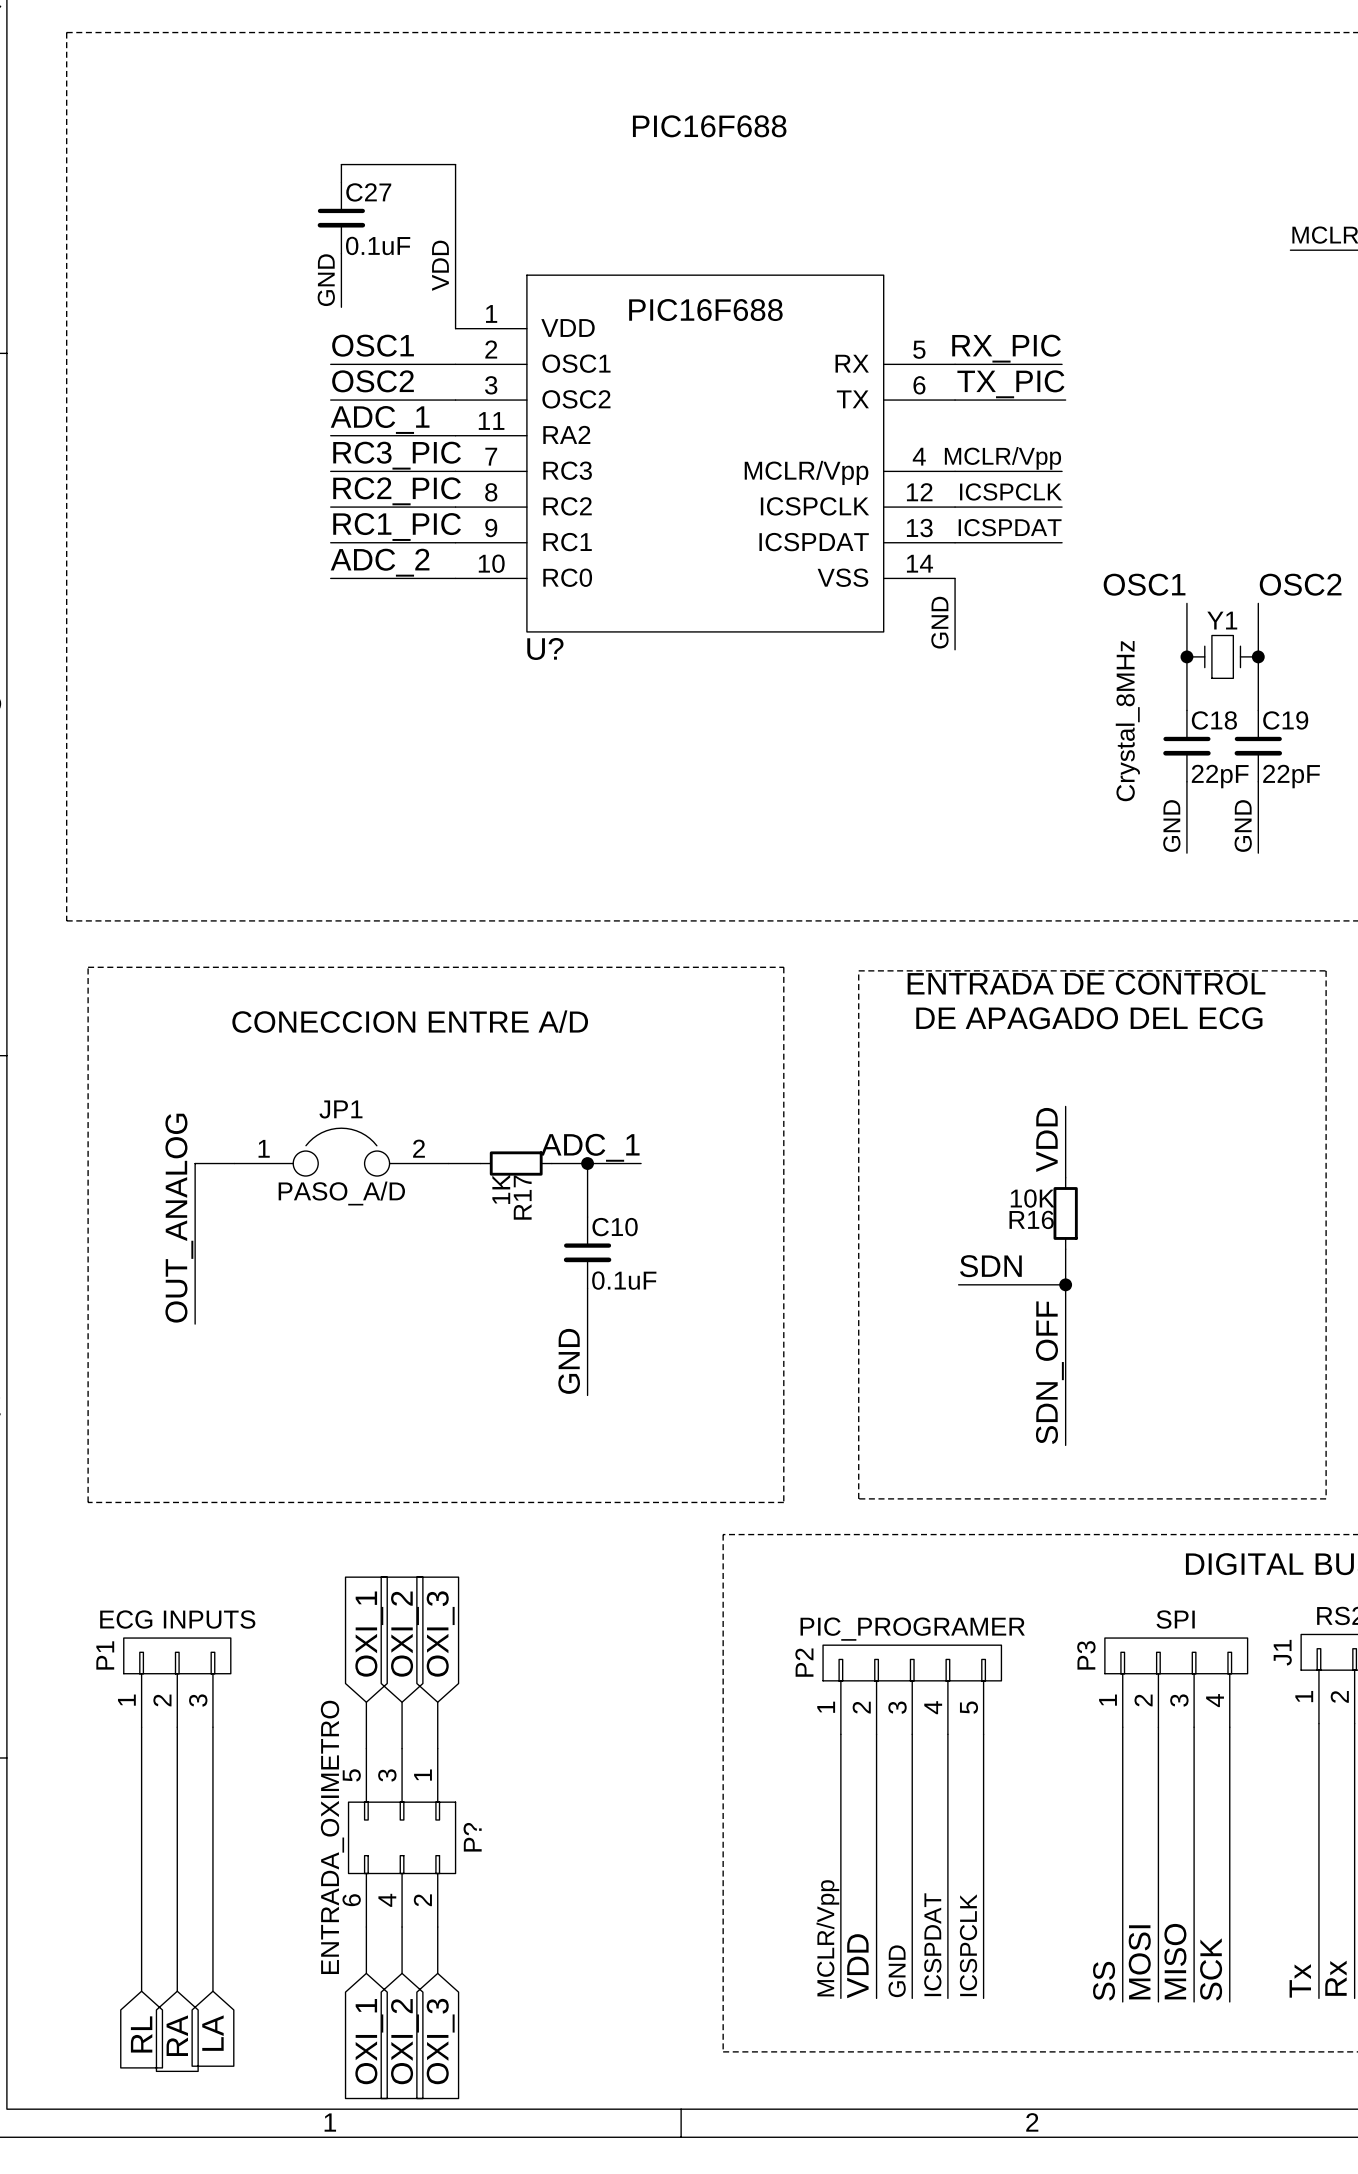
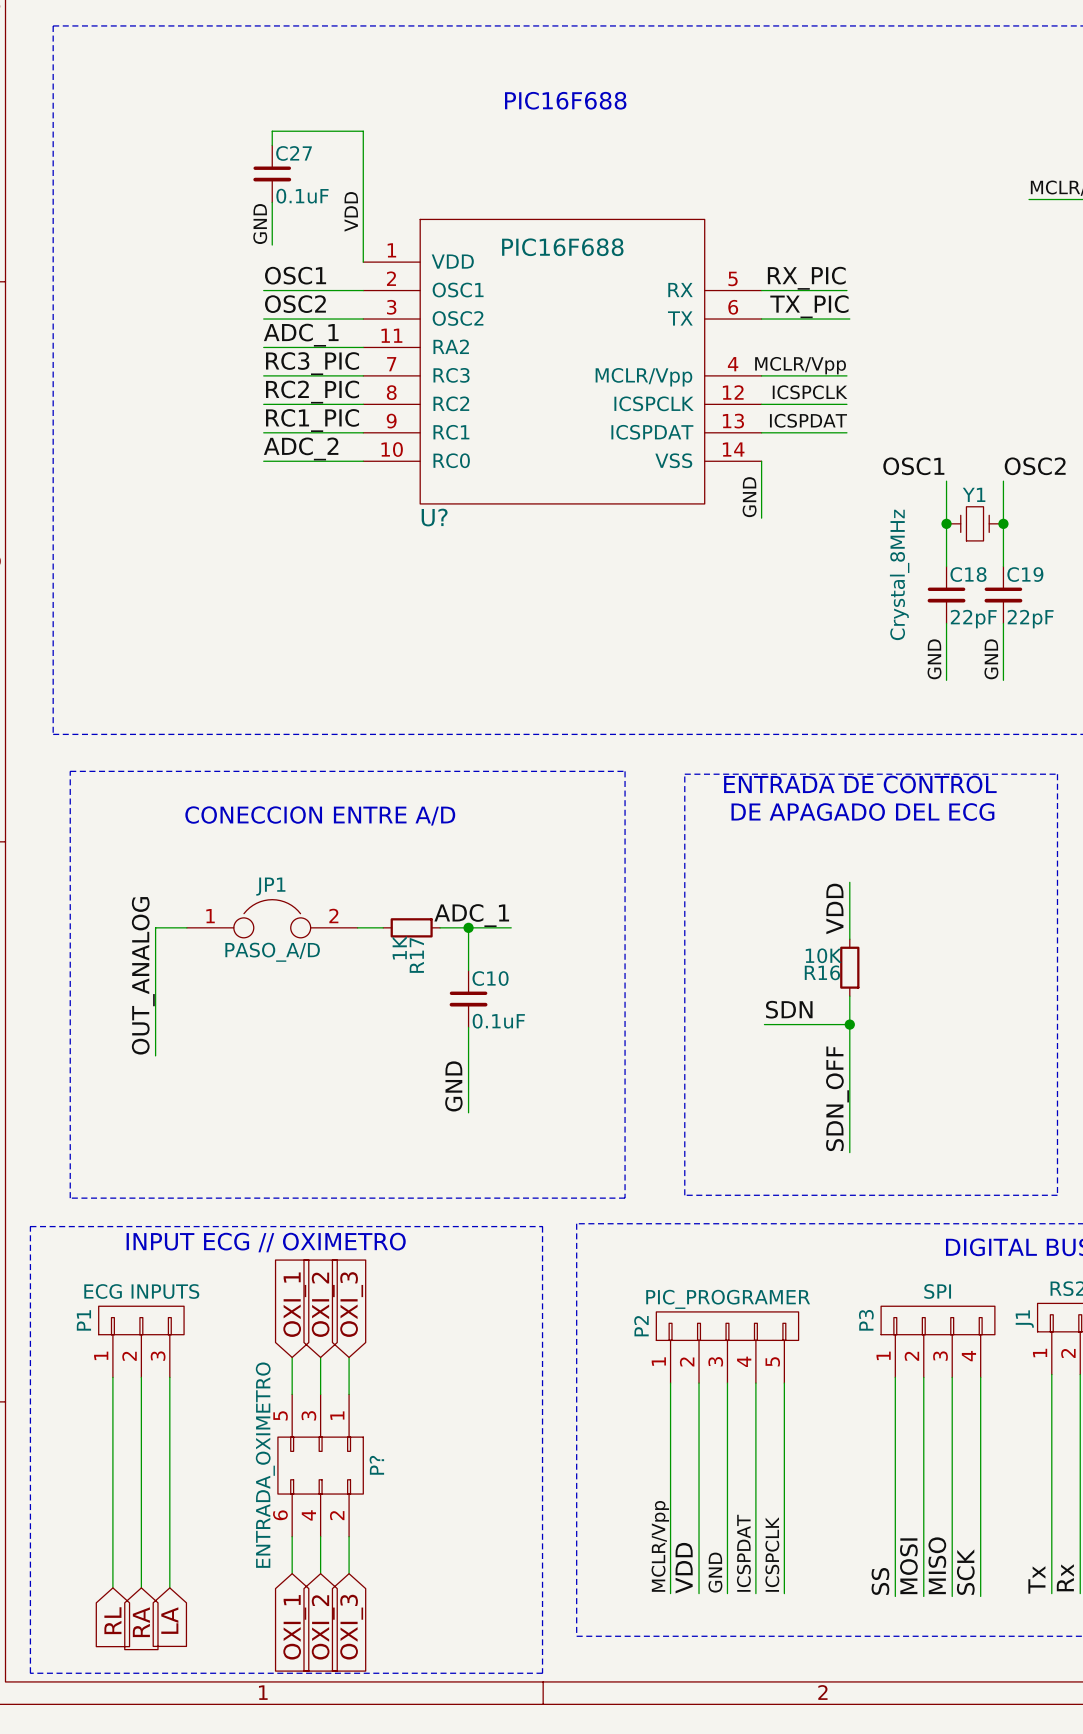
line: none -> (30, 1226) (542, 1226) (542, 1673) (30, 1673) (30, 1226)
text: none -> INPUT ECG // OXIMETRO (266, 1242)

